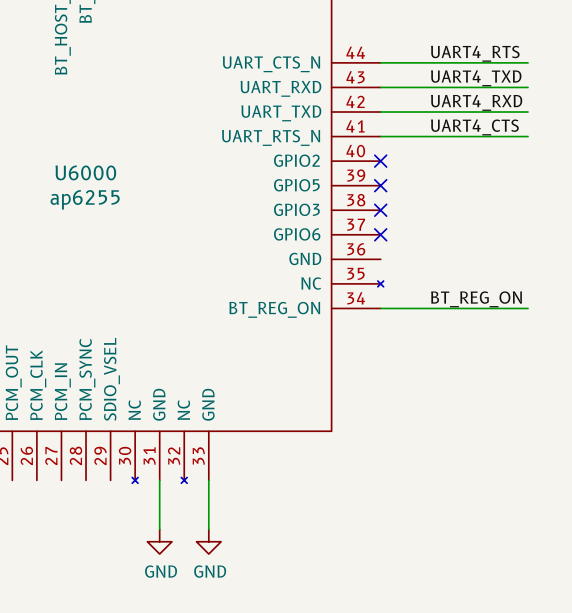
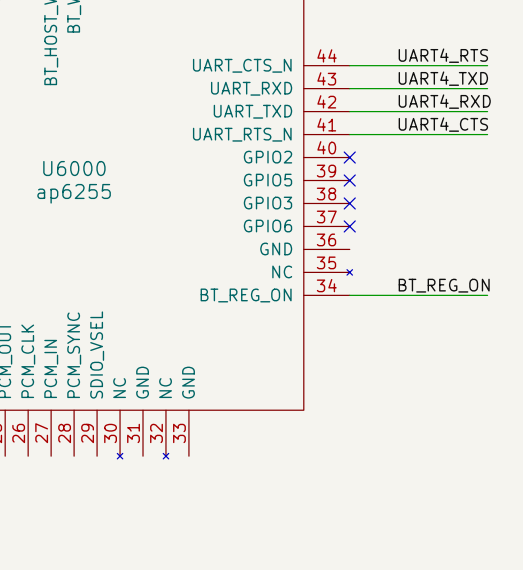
wire: (159, 480) (159, 529) -> none
wire: (208, 480) (208, 529) -> none
power symbol: GND (159, 541) -> none
power symbol: GND (208, 541) -> none

